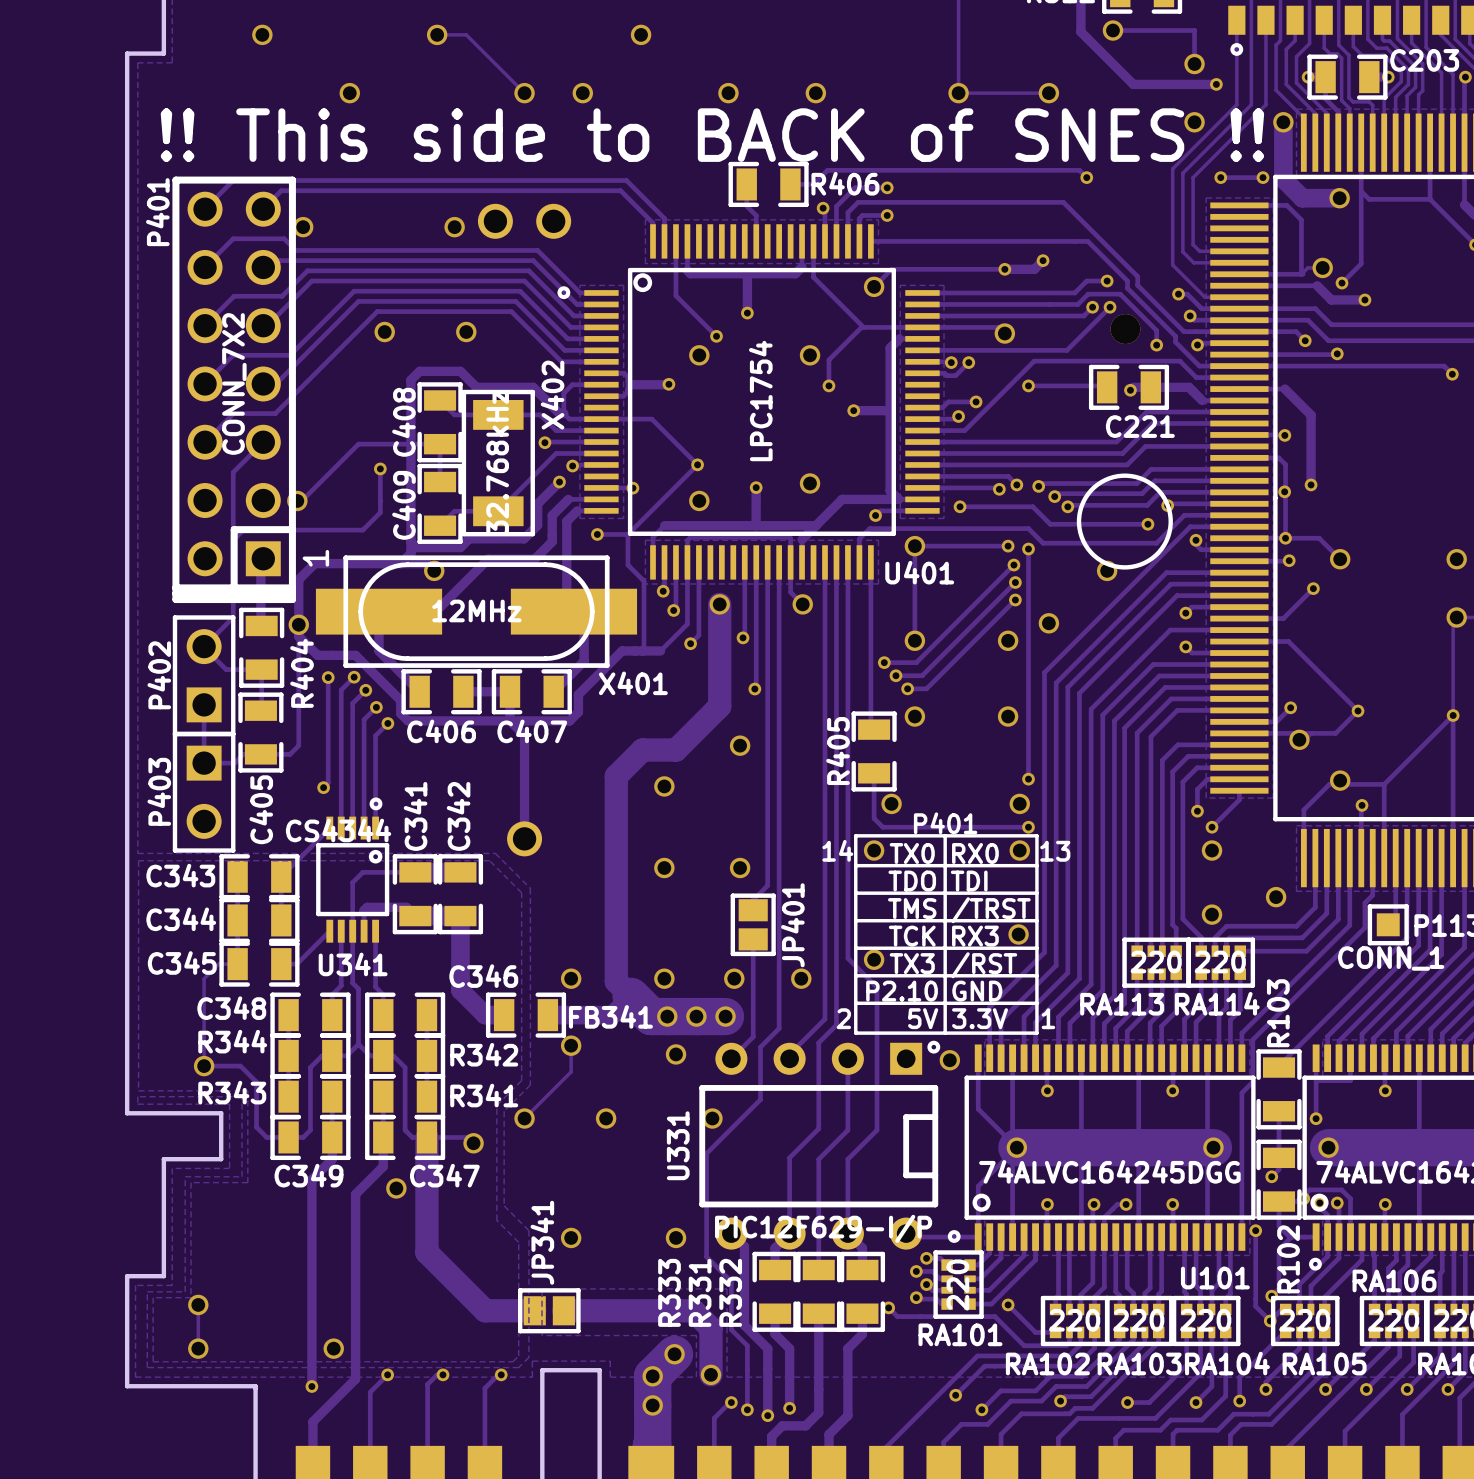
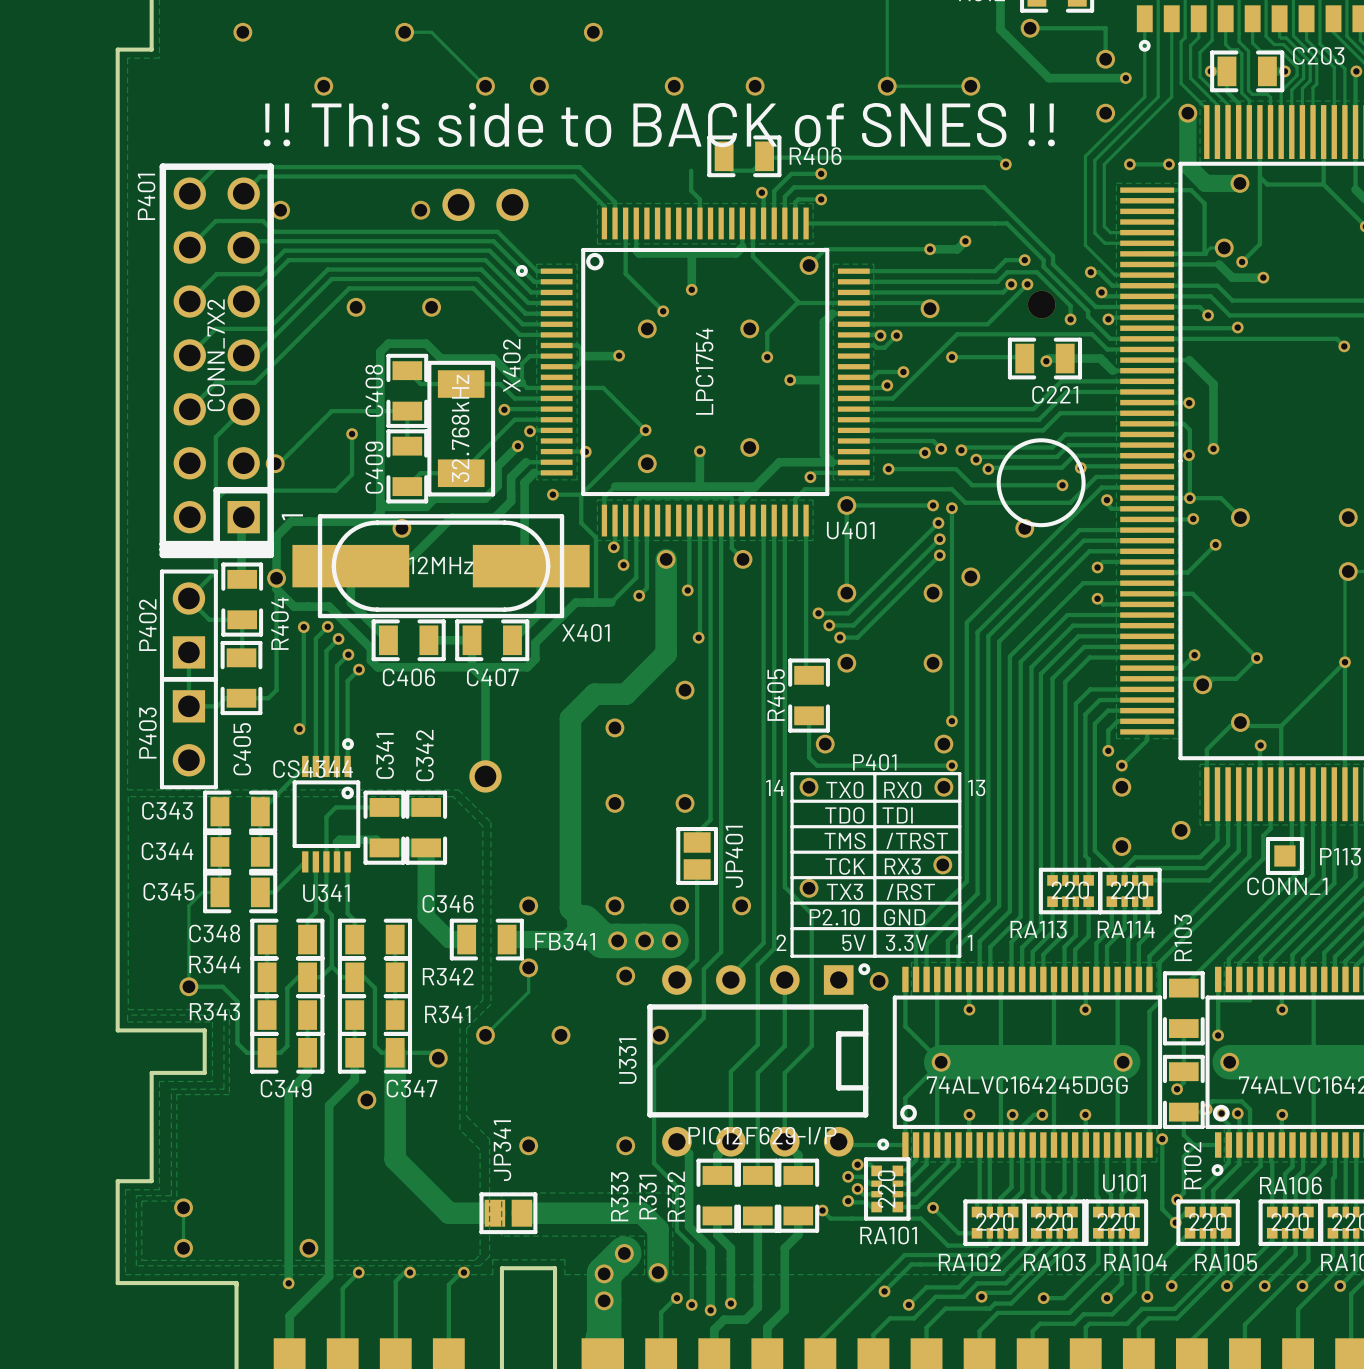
R406 position: (768, 184) -> (744, 156)

